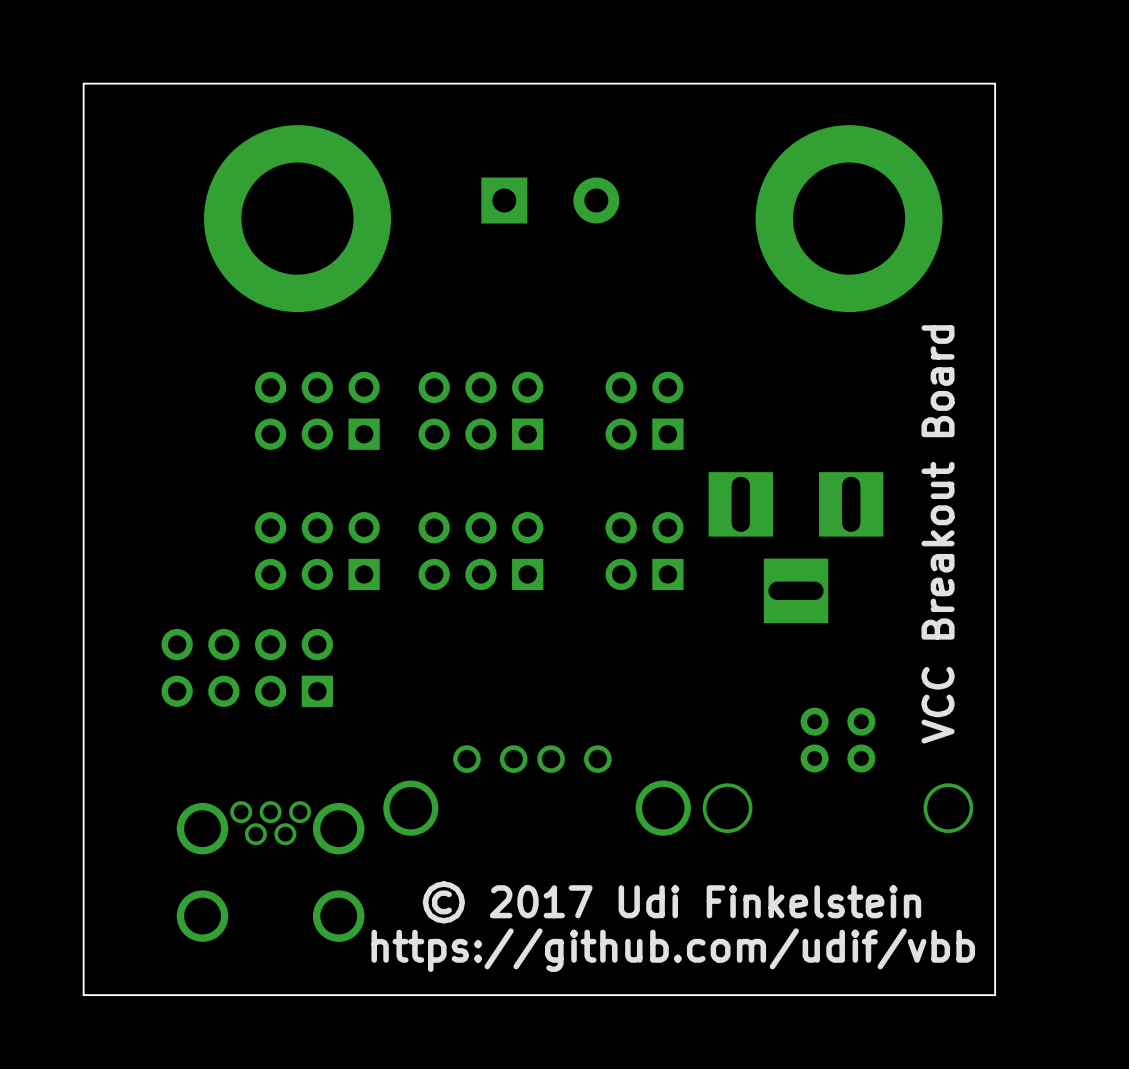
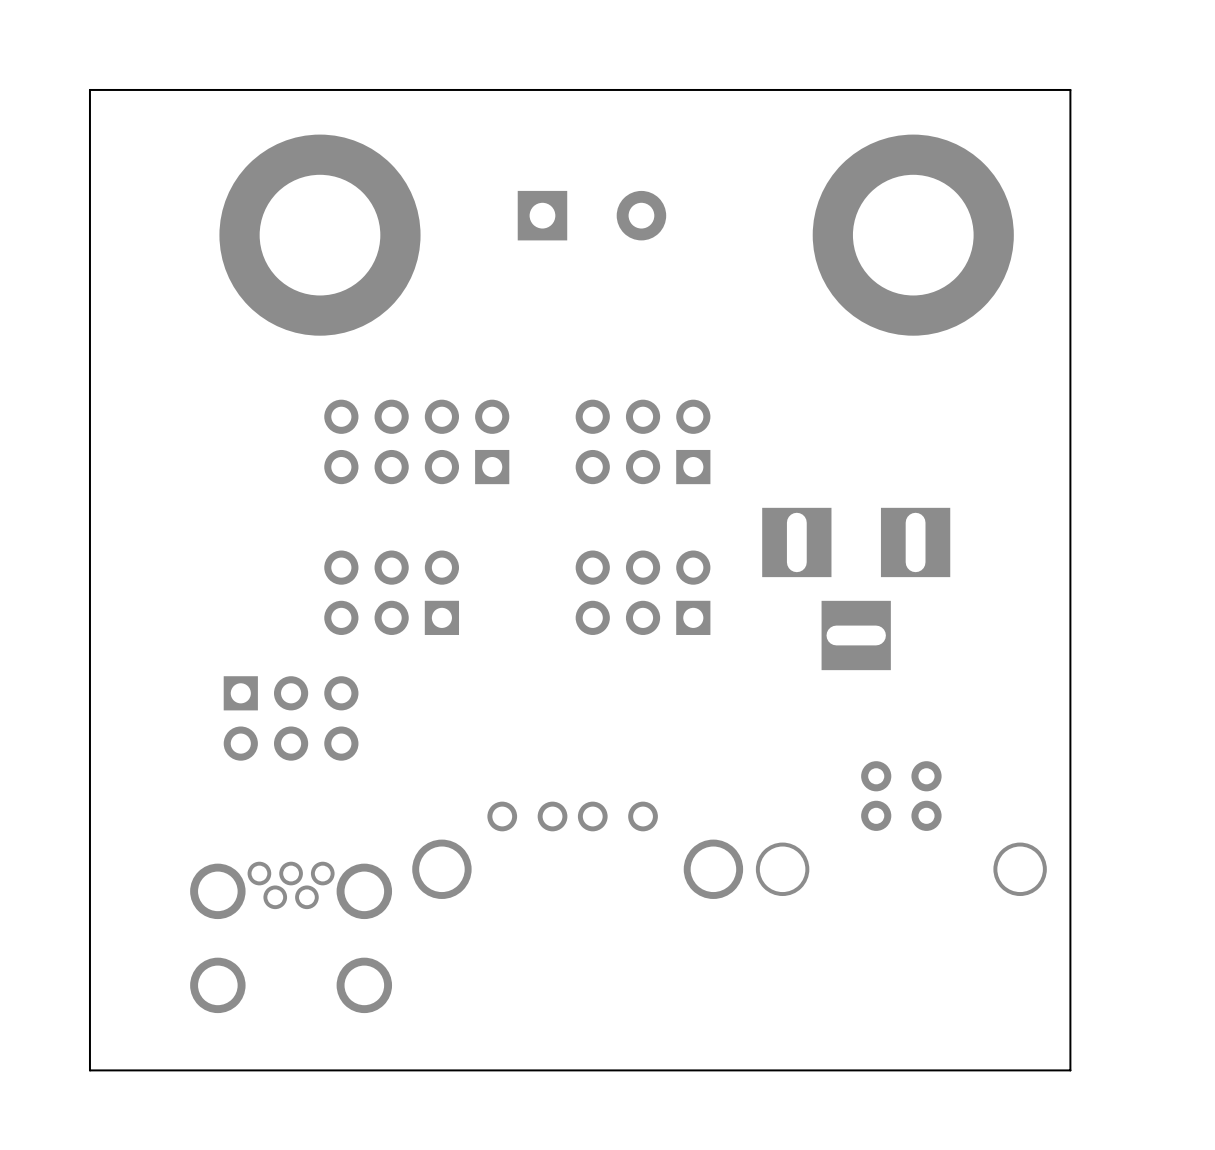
part: (317, 410) -> none
part: none -> (416, 441)
part: (480, 410) -> none
part: none -> (643, 441)
part: (644, 410) -> none
text: VCC Breakout Board (938, 534) -> none
part: (317, 551) -> none
part: none -> (391, 592)
part: (480, 551) -> none
part: none -> (643, 592)
part: (644, 551) -> none
part: (247, 667) -> none
part: none -> (291, 718)
text: © 2017 Udi Finkelstein (671, 902) -> none
text: https://github.com/udif/vbb (673, 950) -> none

